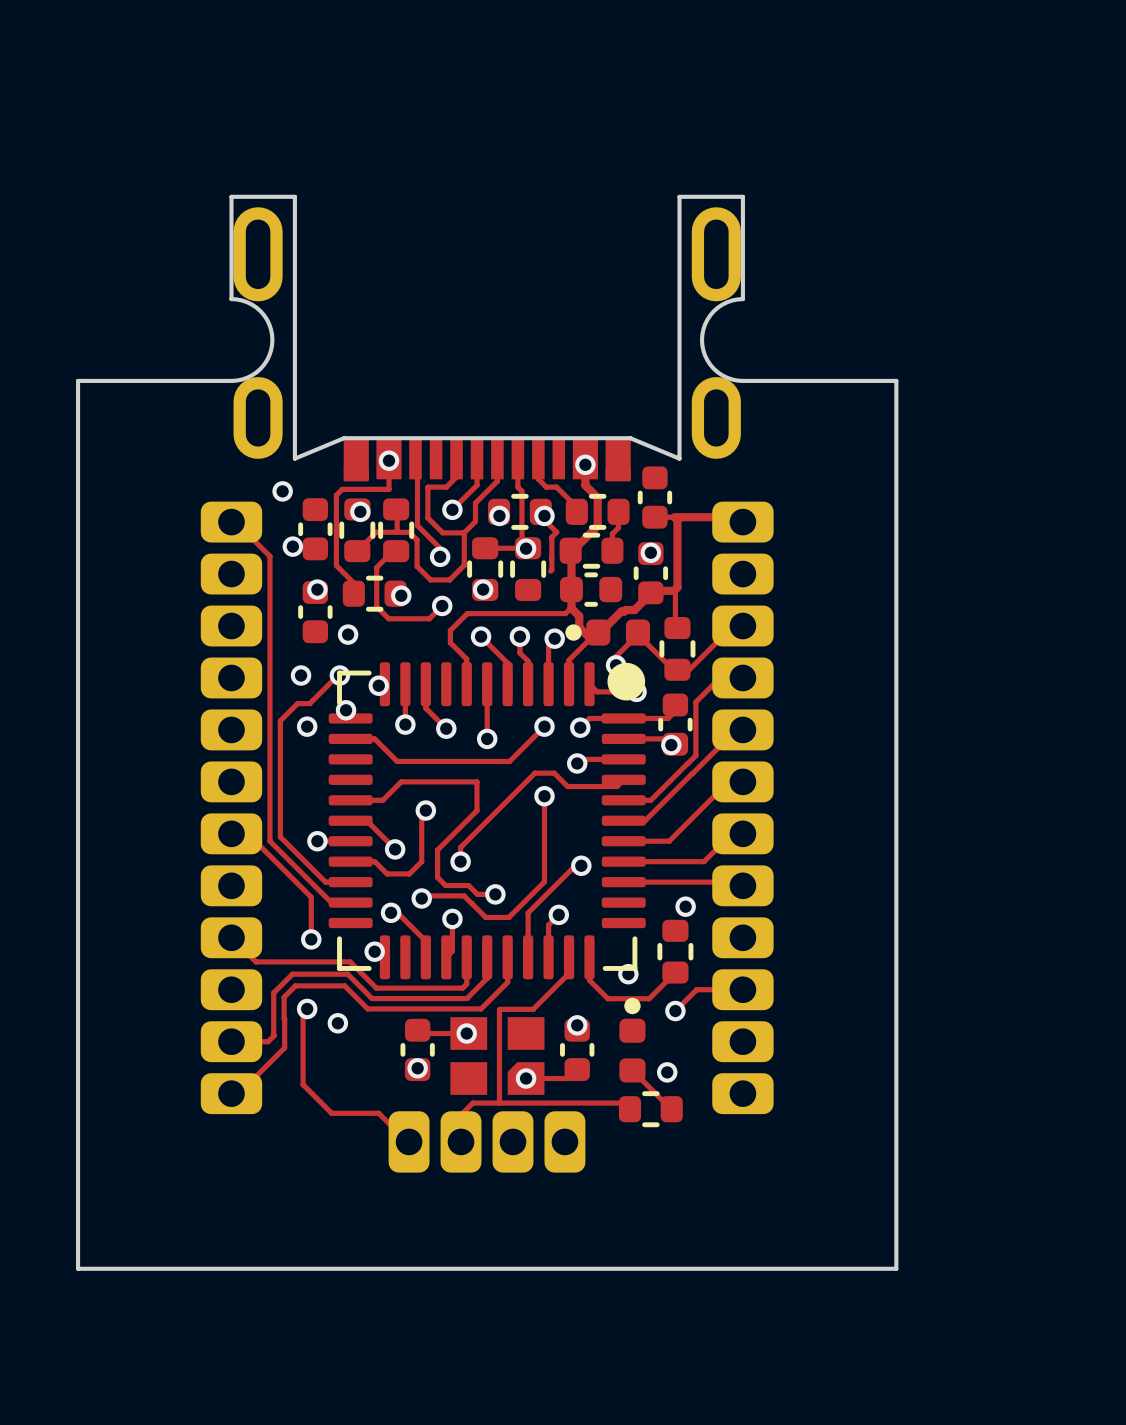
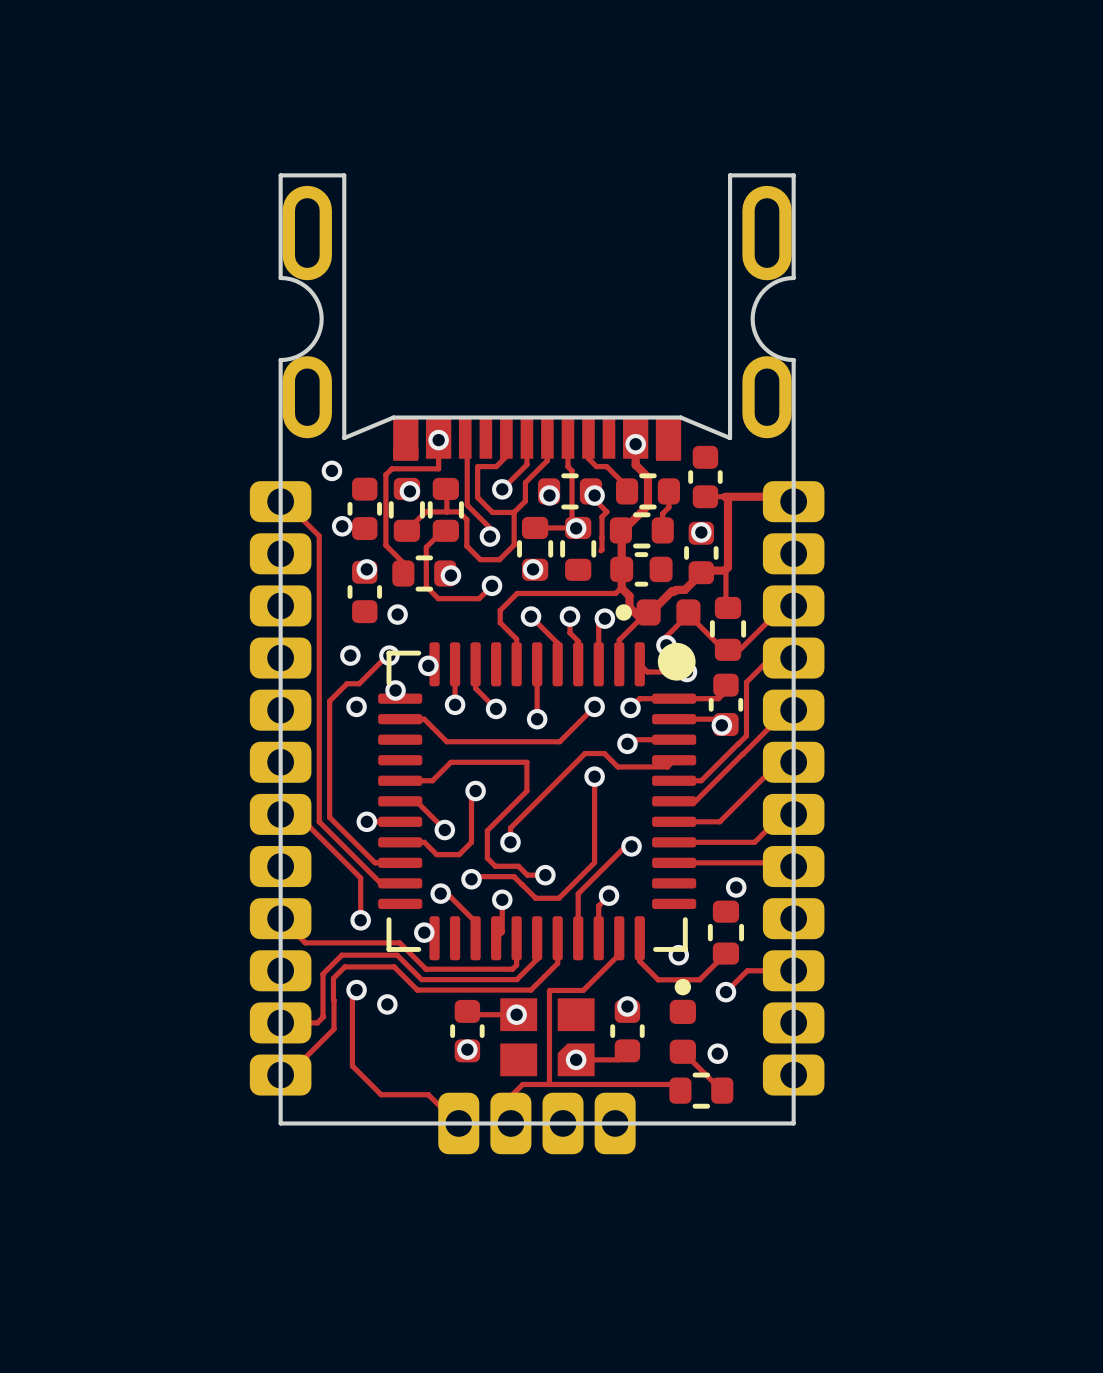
board edge: (231, 380) (78, 380) (78, 1268) (896, 1268) (896, 380) (742, 380) -> (280, 360) (280, 1123) (793, 1123) (793, 360)

